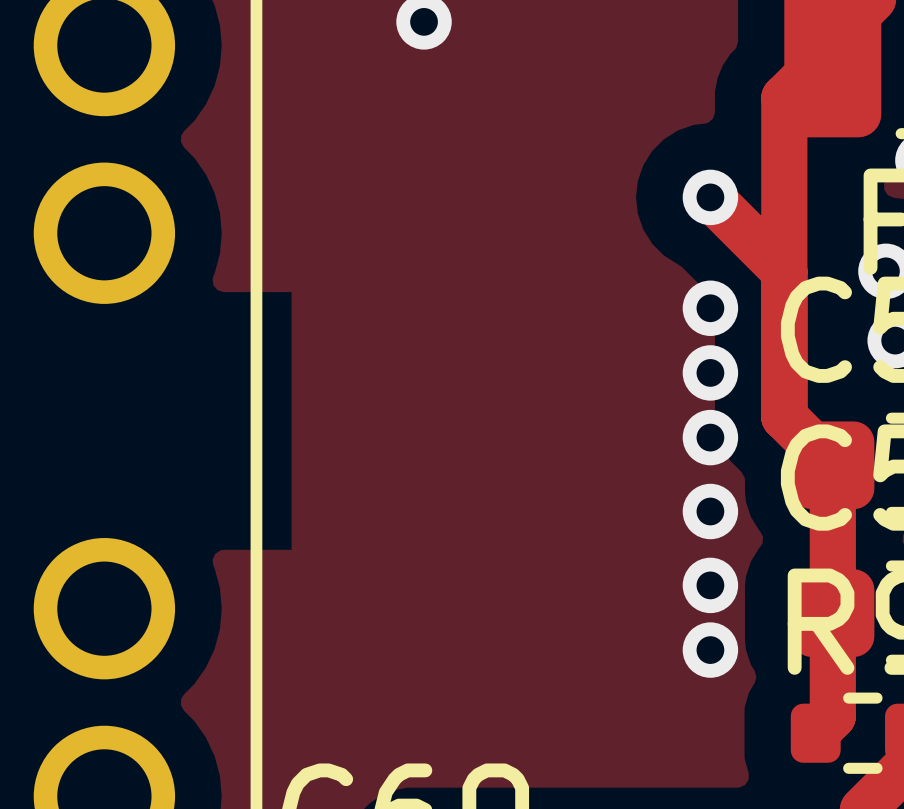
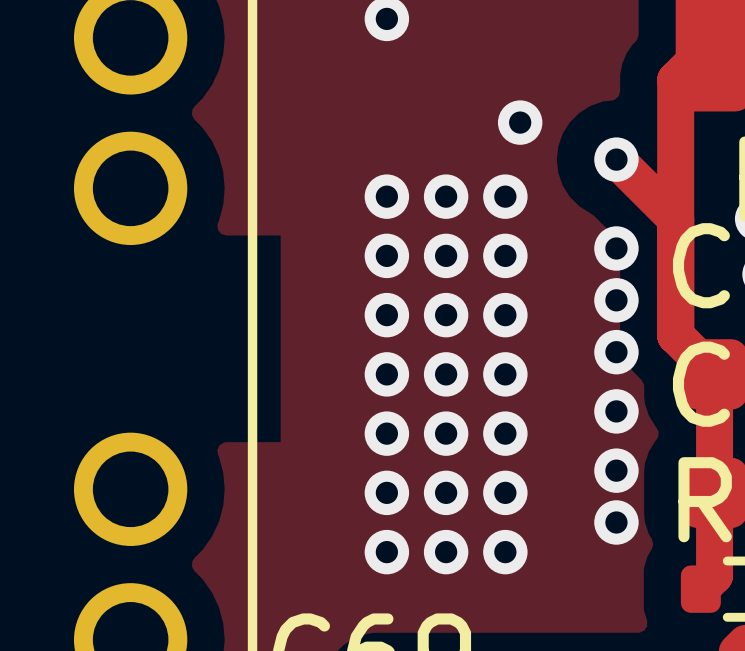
via: none -> (520, 122)
via: none -> (386, 196)
via: none -> (446, 196)
via: none -> (505, 196)
via: none -> (386, 255)
via: none -> (446, 255)
via: none -> (505, 255)
via: none -> (386, 315)
via: none -> (446, 315)
via: none -> (505, 315)
via: none -> (386, 374)
via: none -> (446, 374)
via: none -> (505, 374)
via: none -> (386, 433)
via: none -> (446, 433)
via: none -> (505, 433)
via: none -> (386, 492)
via: none -> (446, 492)
via: none -> (505, 492)
via: none -> (386, 552)
via: none -> (446, 552)
via: none -> (505, 552)

